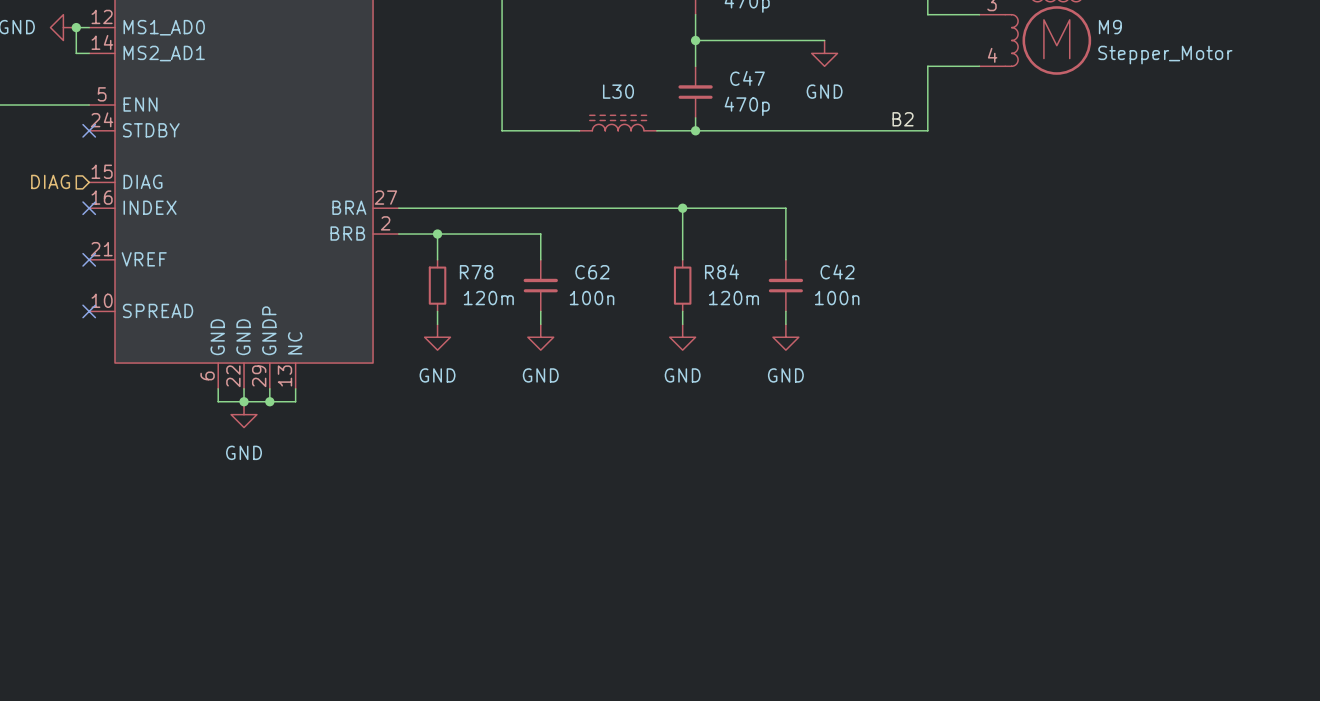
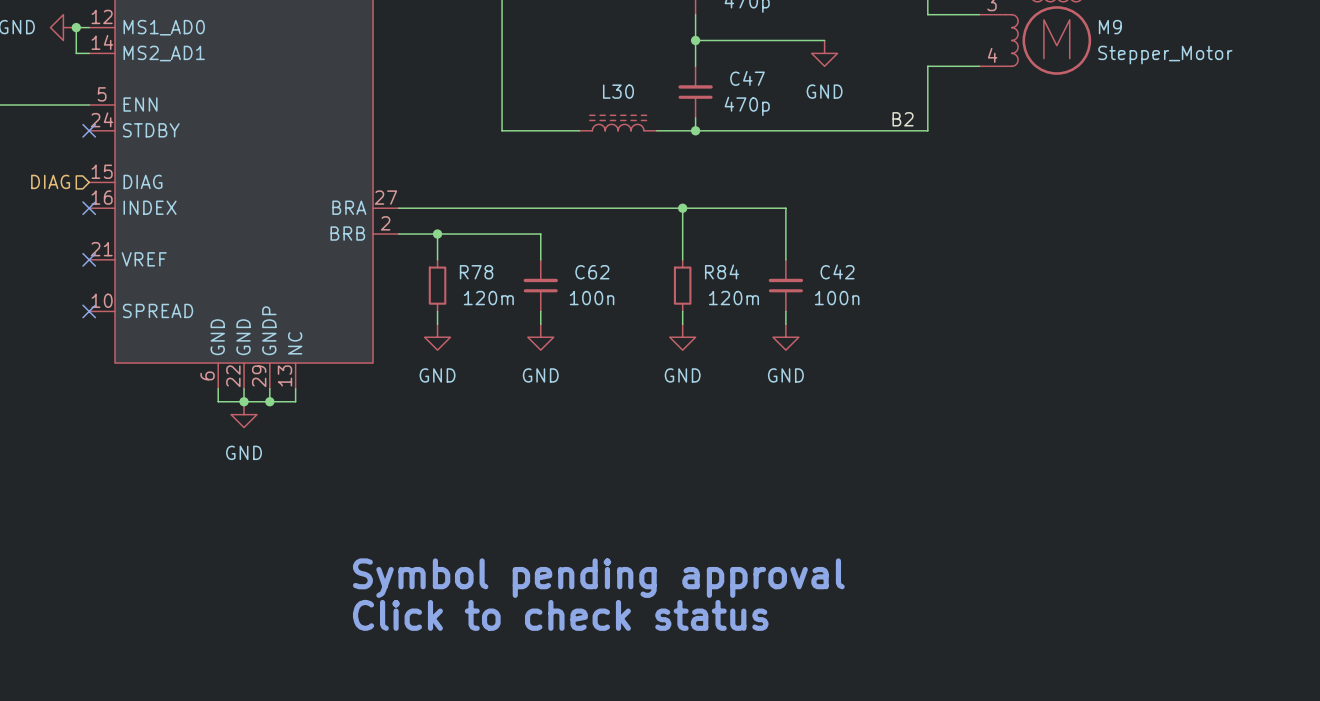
text: none -> Symbol pending approval (598, 578)
text: none -> Click to check status (560, 615)

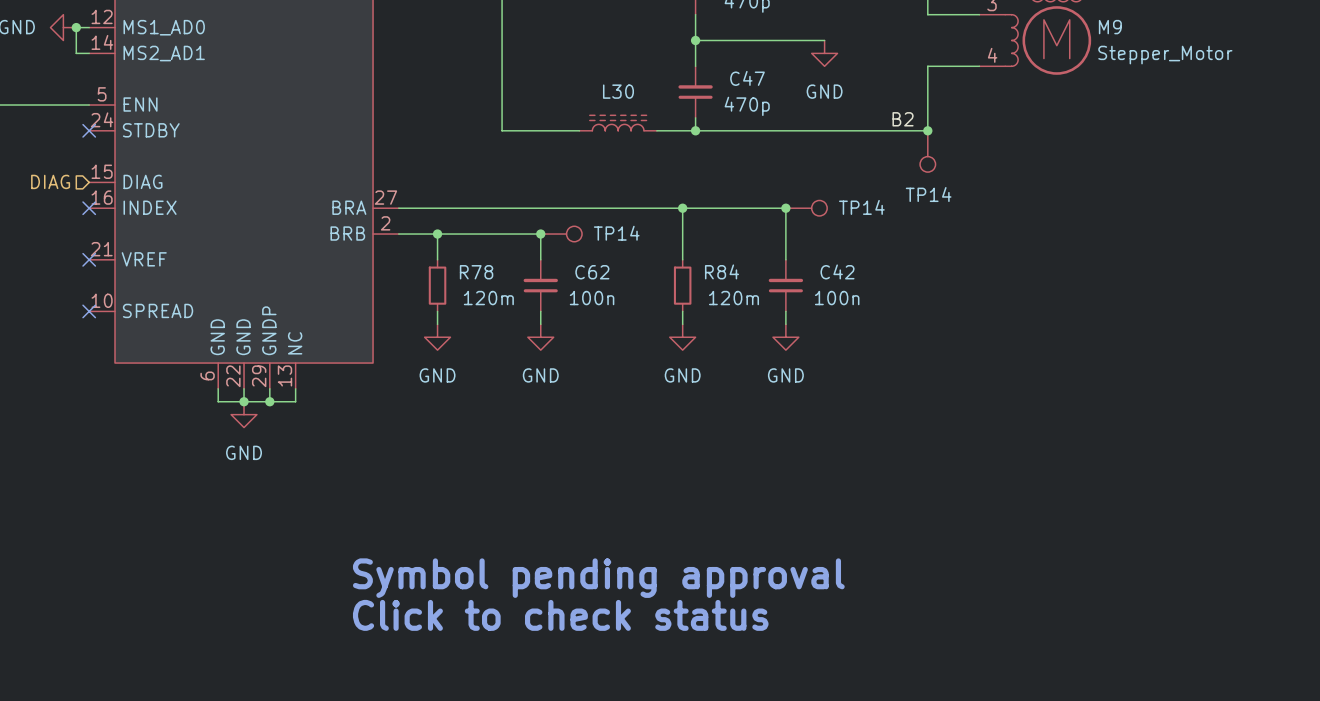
junction: none -> (927, 130)
TP14: none -> (927, 151)
junction: none -> (785, 208)
TP14: none -> (806, 208)
junction: none -> (540, 234)
TP14: none -> (561, 234)

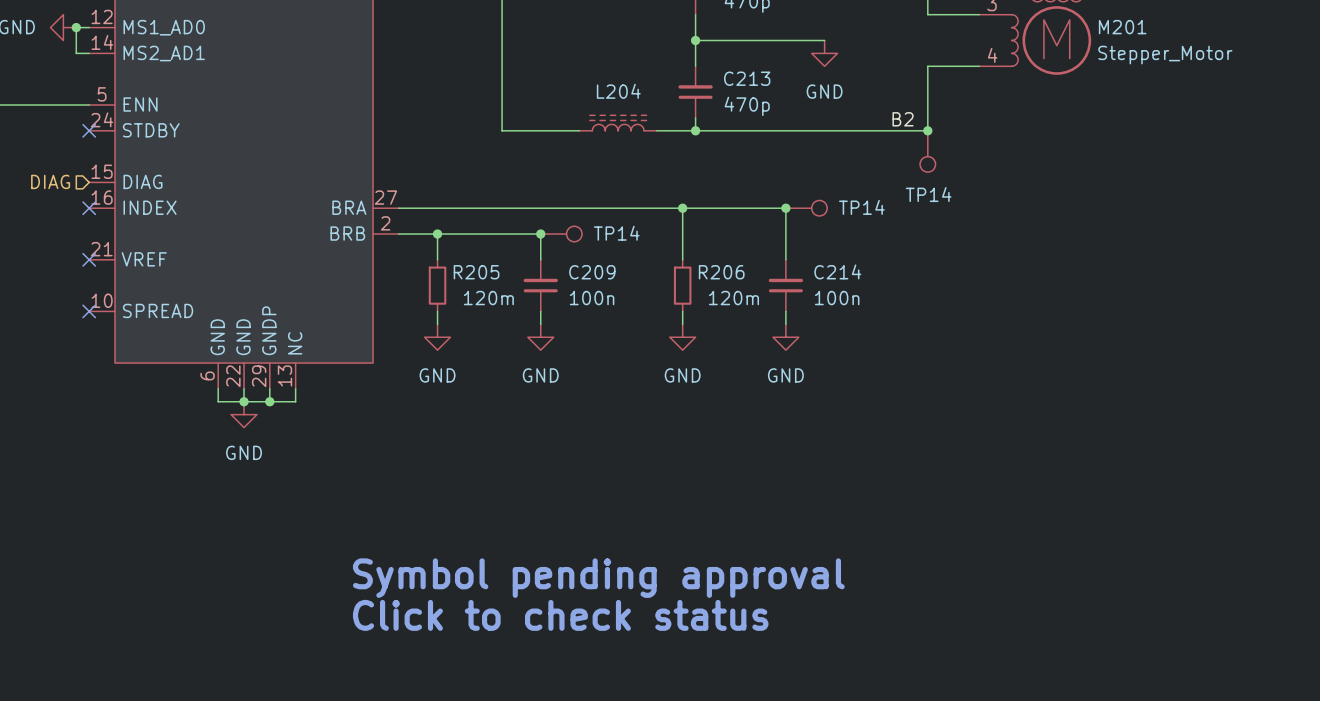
M9 name: M9 (1110, 27) -> M201 (1122, 27)
C47 name: C47 (747, 78) -> C213 (747, 78)
L30 name: L30 (618, 91) -> L204 (618, 91)
R84 name: R84 (722, 271) -> R206 (721, 272)
C42 name: C42 (837, 271) -> C214 (837, 271)
R78 name: R78 (476, 272) -> R205 (476, 272)
C62 name: C62 (592, 272) -> C209 (592, 272)

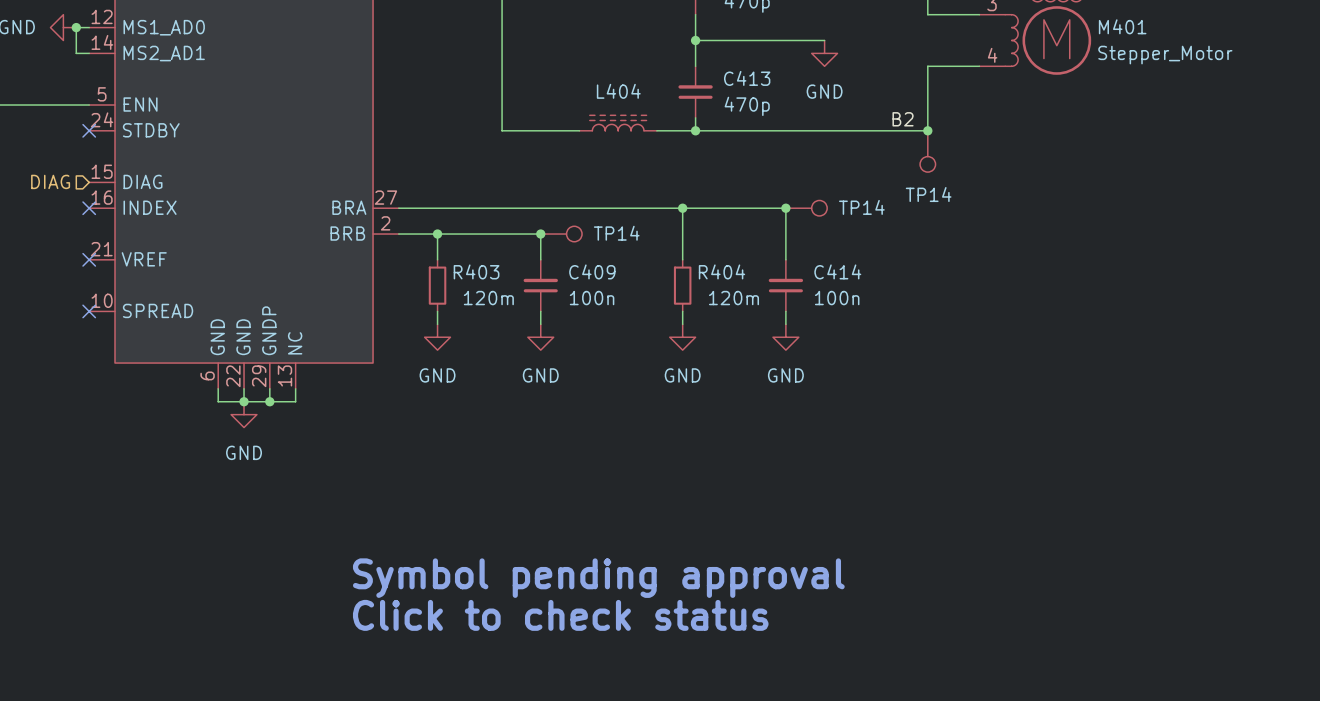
M201 name: M201 (1122, 27) -> M401 (1122, 26)
C213 name: C213 (747, 78) -> C413 (747, 78)
L204 name: L204 (618, 91) -> L404 (618, 91)
C214 name: C214 (837, 271) -> C414 (837, 271)
R205 name: R205 (476, 272) -> R403 (476, 271)
C209 name: C209 (592, 272) -> C409 (592, 271)
R206 name: R206 (721, 272) -> R404 (722, 271)

